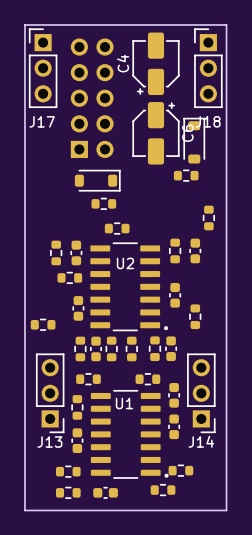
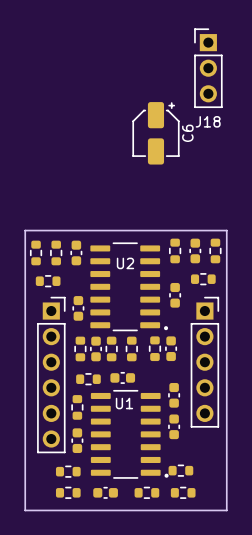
C4: (155, 63) -> none
J17: (43, 68) -> none
part: (92, 98) -> none
part: (194, 140) -> none
part: (186, 175) -> none
part: (97, 180) -> none
part: (103, 203) -> none
part: (208, 217) -> none
part: (117, 228) -> none
part: none -> (215, 250)
part: none -> (36, 252)
part: (69, 277) -> none
part: none -> (203, 279)
part: none -> (48, 281)
part: (195, 316) -> none
part: (43, 324) -> none
part: none -> (204, 362)
part: none -> (51, 375)
part: none -> (122, 377)
part: (147, 379) -> none
J13: (50, 393) -> none
J14: (201, 393) -> none
part: (163, 490) -> none
part: none -> (146, 492)
part: none -> (183, 492)
board edge: (25, 510) (24, 24) (226, 24) (226, 510) -> (25, 510) (25, 230) (226, 230) (226, 510)

